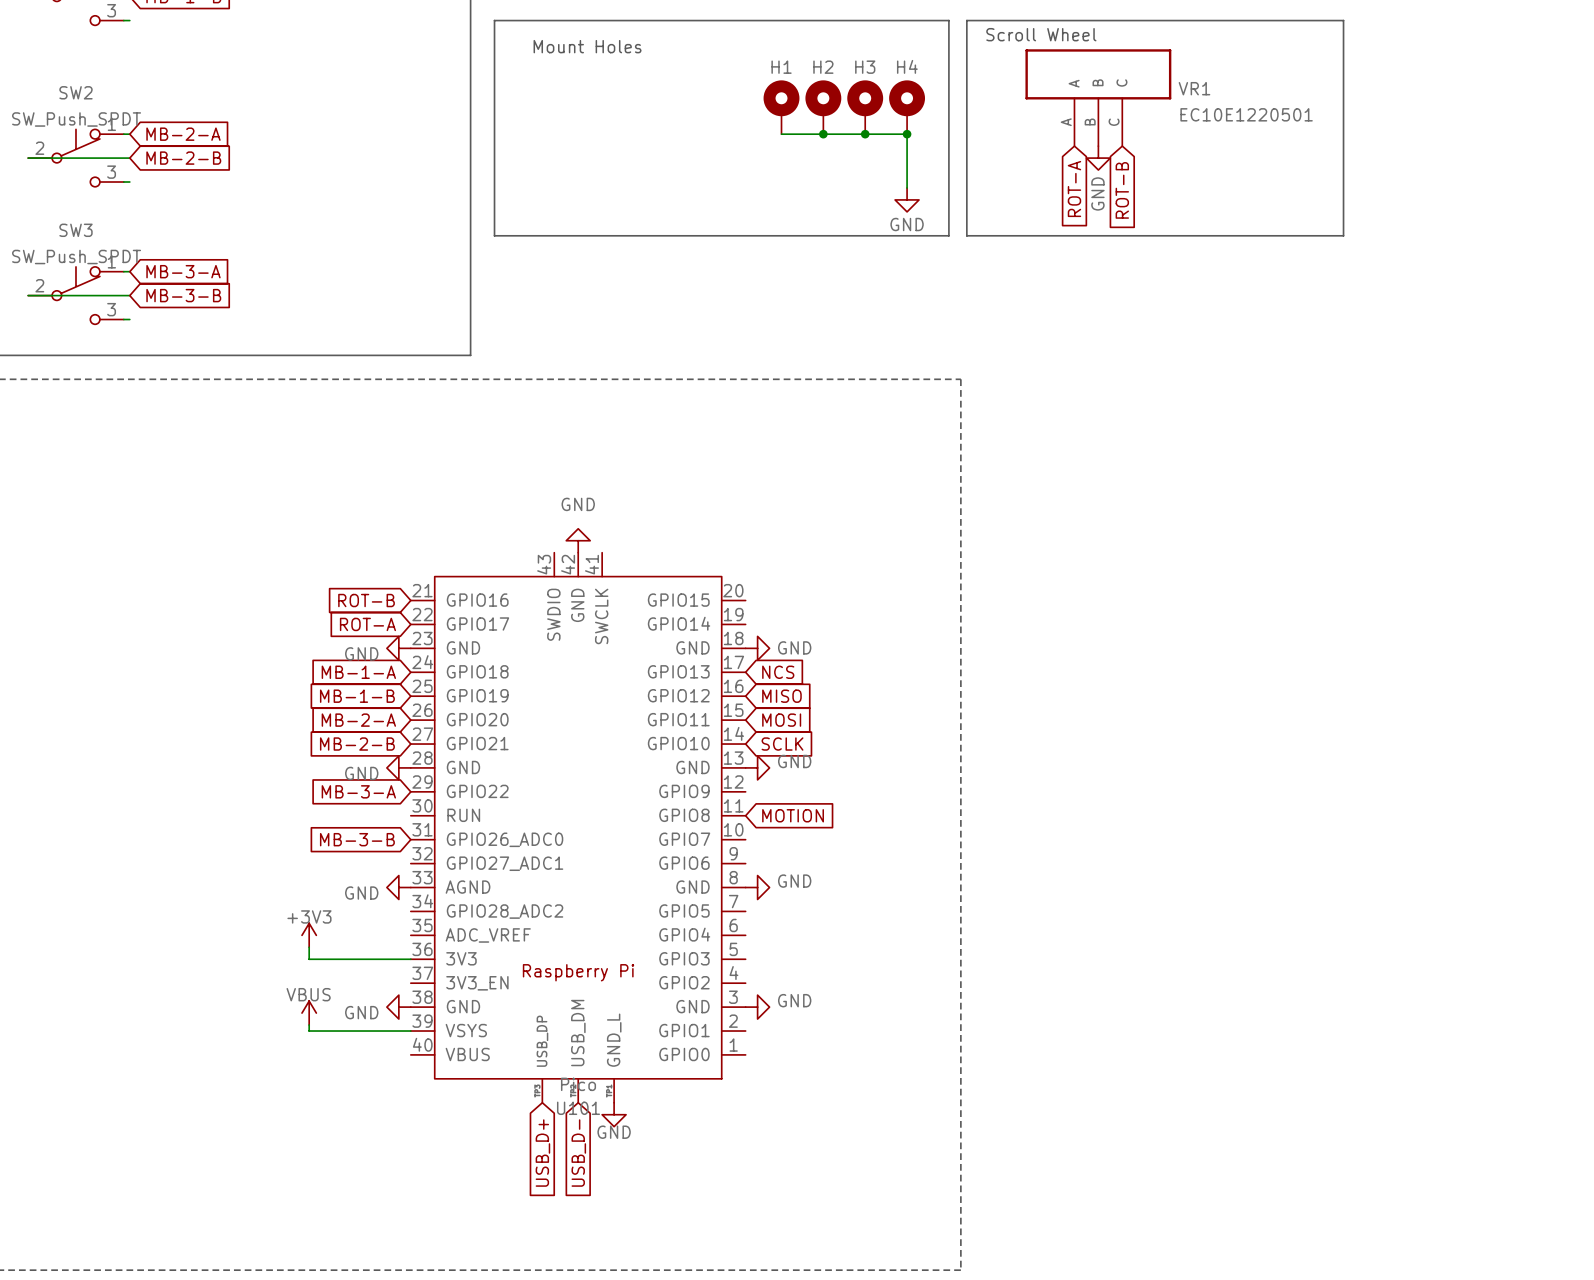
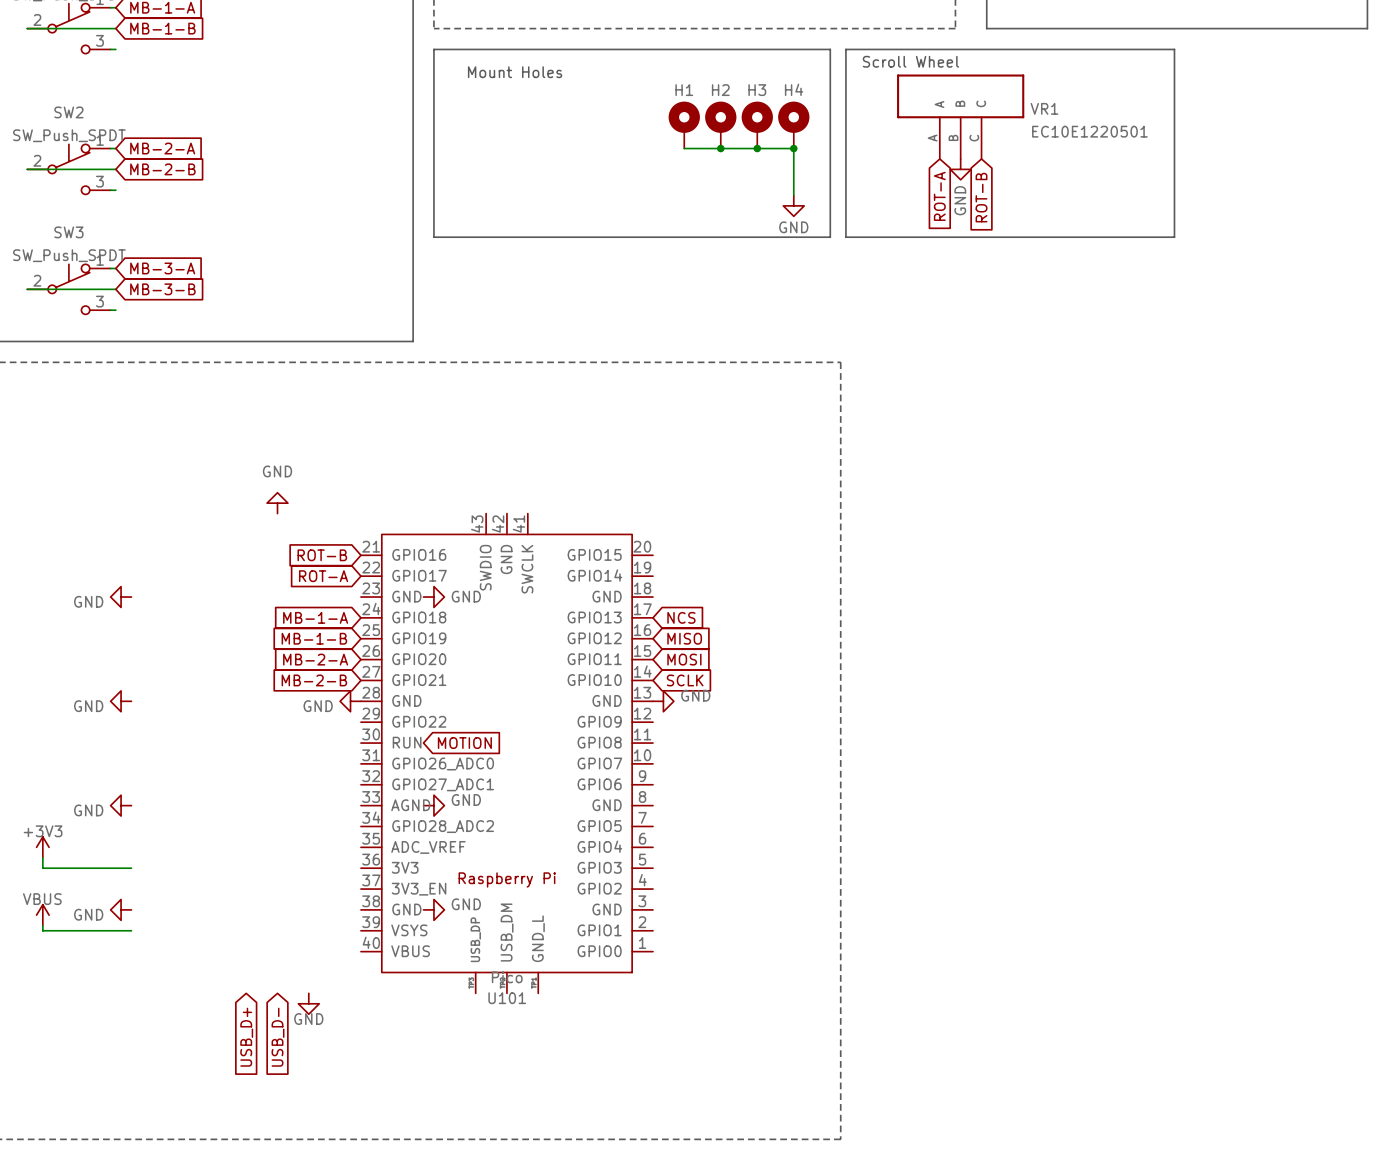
power symbol: none -> GND (277, 503)
power symbol: GND (578, 540) -> none
power symbol: none -> GND (121, 597)
power symbol: GND (398, 648) -> none
power symbol: none -> GND (433, 597)
power symbol: GND (757, 648) -> none
power symbol: none -> GND (121, 701)
global label: MB-3-A (358, 791) -> none
global label: none -> MOTION (464, 743)
global label: MOTION (793, 815) -> none
global label: MB-3-B (357, 839) -> none
power symbol: none -> GND (121, 805)
power symbol: GND (398, 887) -> none
power symbol: none -> GND (433, 805)
power symbol: GND (757, 887) -> none
power symbol: none -> +3V3 (42, 847)
power symbol: +3V3 (309, 935) -> none
wire: none -> (42, 857) (42, 868) (131, 868)
wire: (309, 947) (309, 959) (410, 959) -> none
power symbol: none -> GND (121, 909)
power symbol: GND (398, 1007) -> none
power symbol: none -> GND (433, 909)
power symbol: GND (757, 1007) -> none
power symbol: none -> VBUS (42, 915)
power symbol: VBUS (309, 1013) -> none
wire: none -> (42, 925) (42, 930) (131, 930)
wire: (309, 1025) (309, 1031) (410, 1031) -> none
power symbol: none -> GND (308, 1003)
power symbol: GND (614, 1114) -> none
global label: none -> USB_D+ (246, 1037)
global label: none -> USB_D- (278, 1037)
global label: USB_D+ (542, 1153) -> none
global label: USB_D- (578, 1153) -> none

